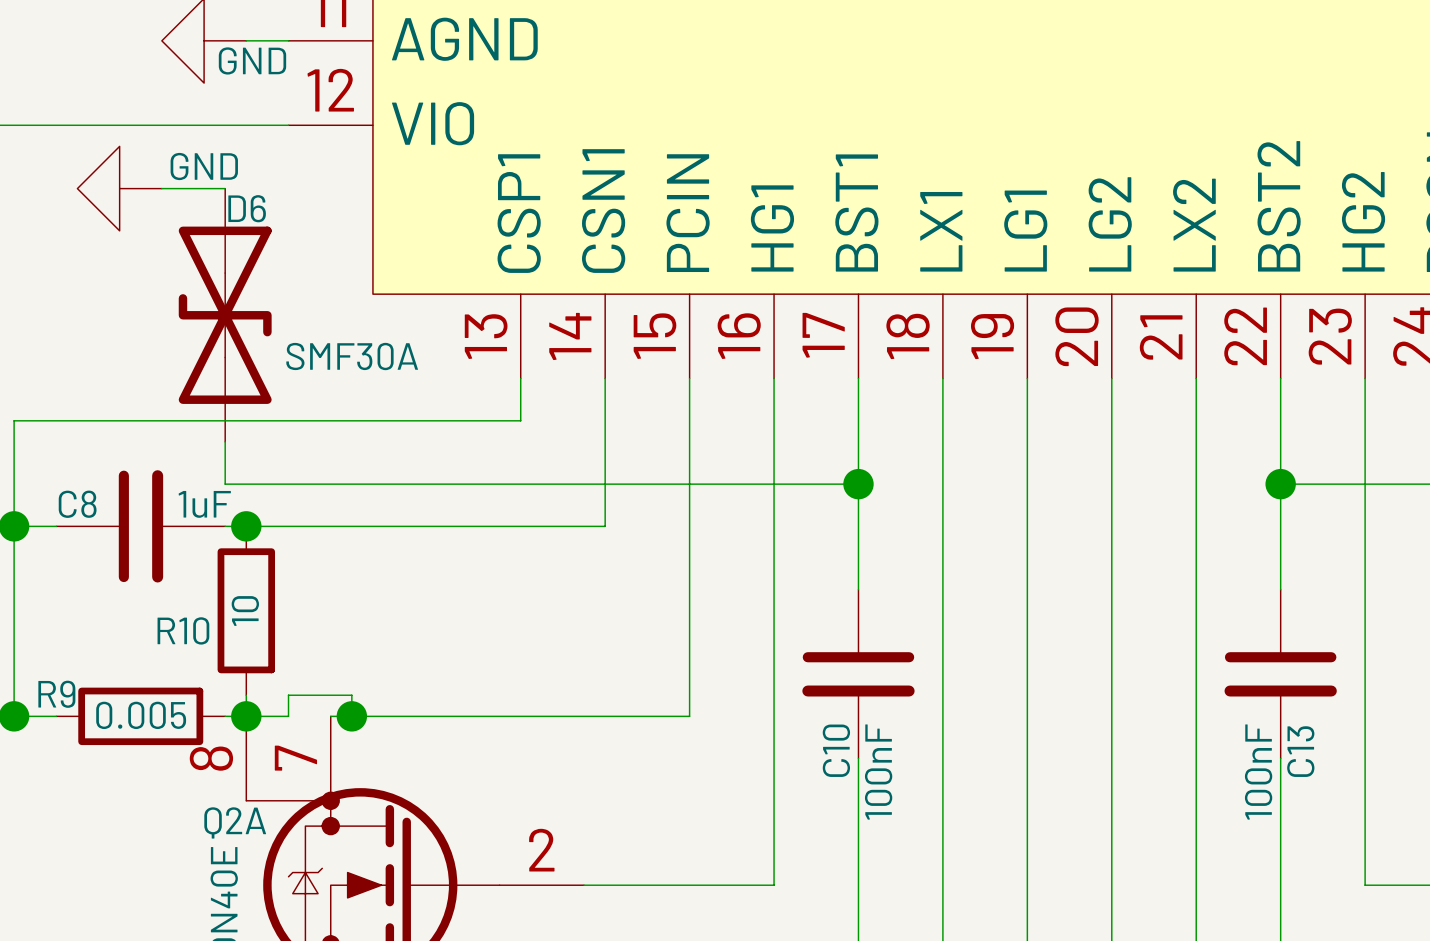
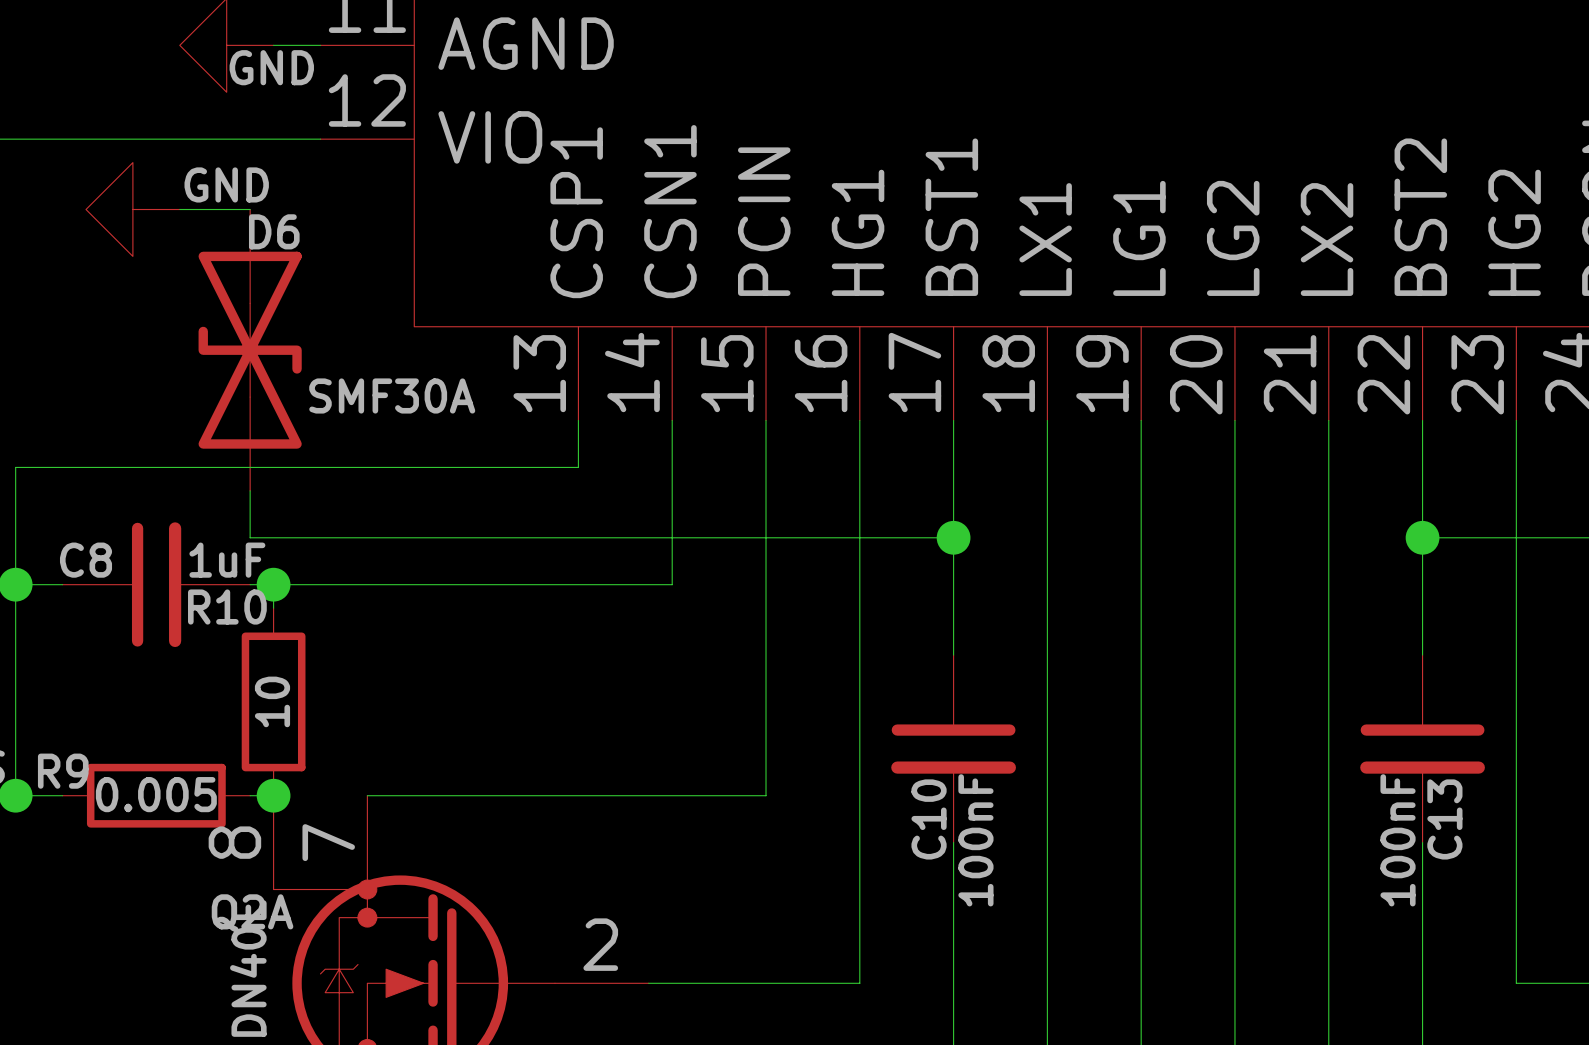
R10 position: (246, 610) -> (273, 701)
R10 name position: R10 (183, 630) -> R10 (227, 607)
wire: (246, 695) (246, 716) (288, 716) (288, 695) (351, 695) (351, 716) -> none
junction: (351, 716) -> none

